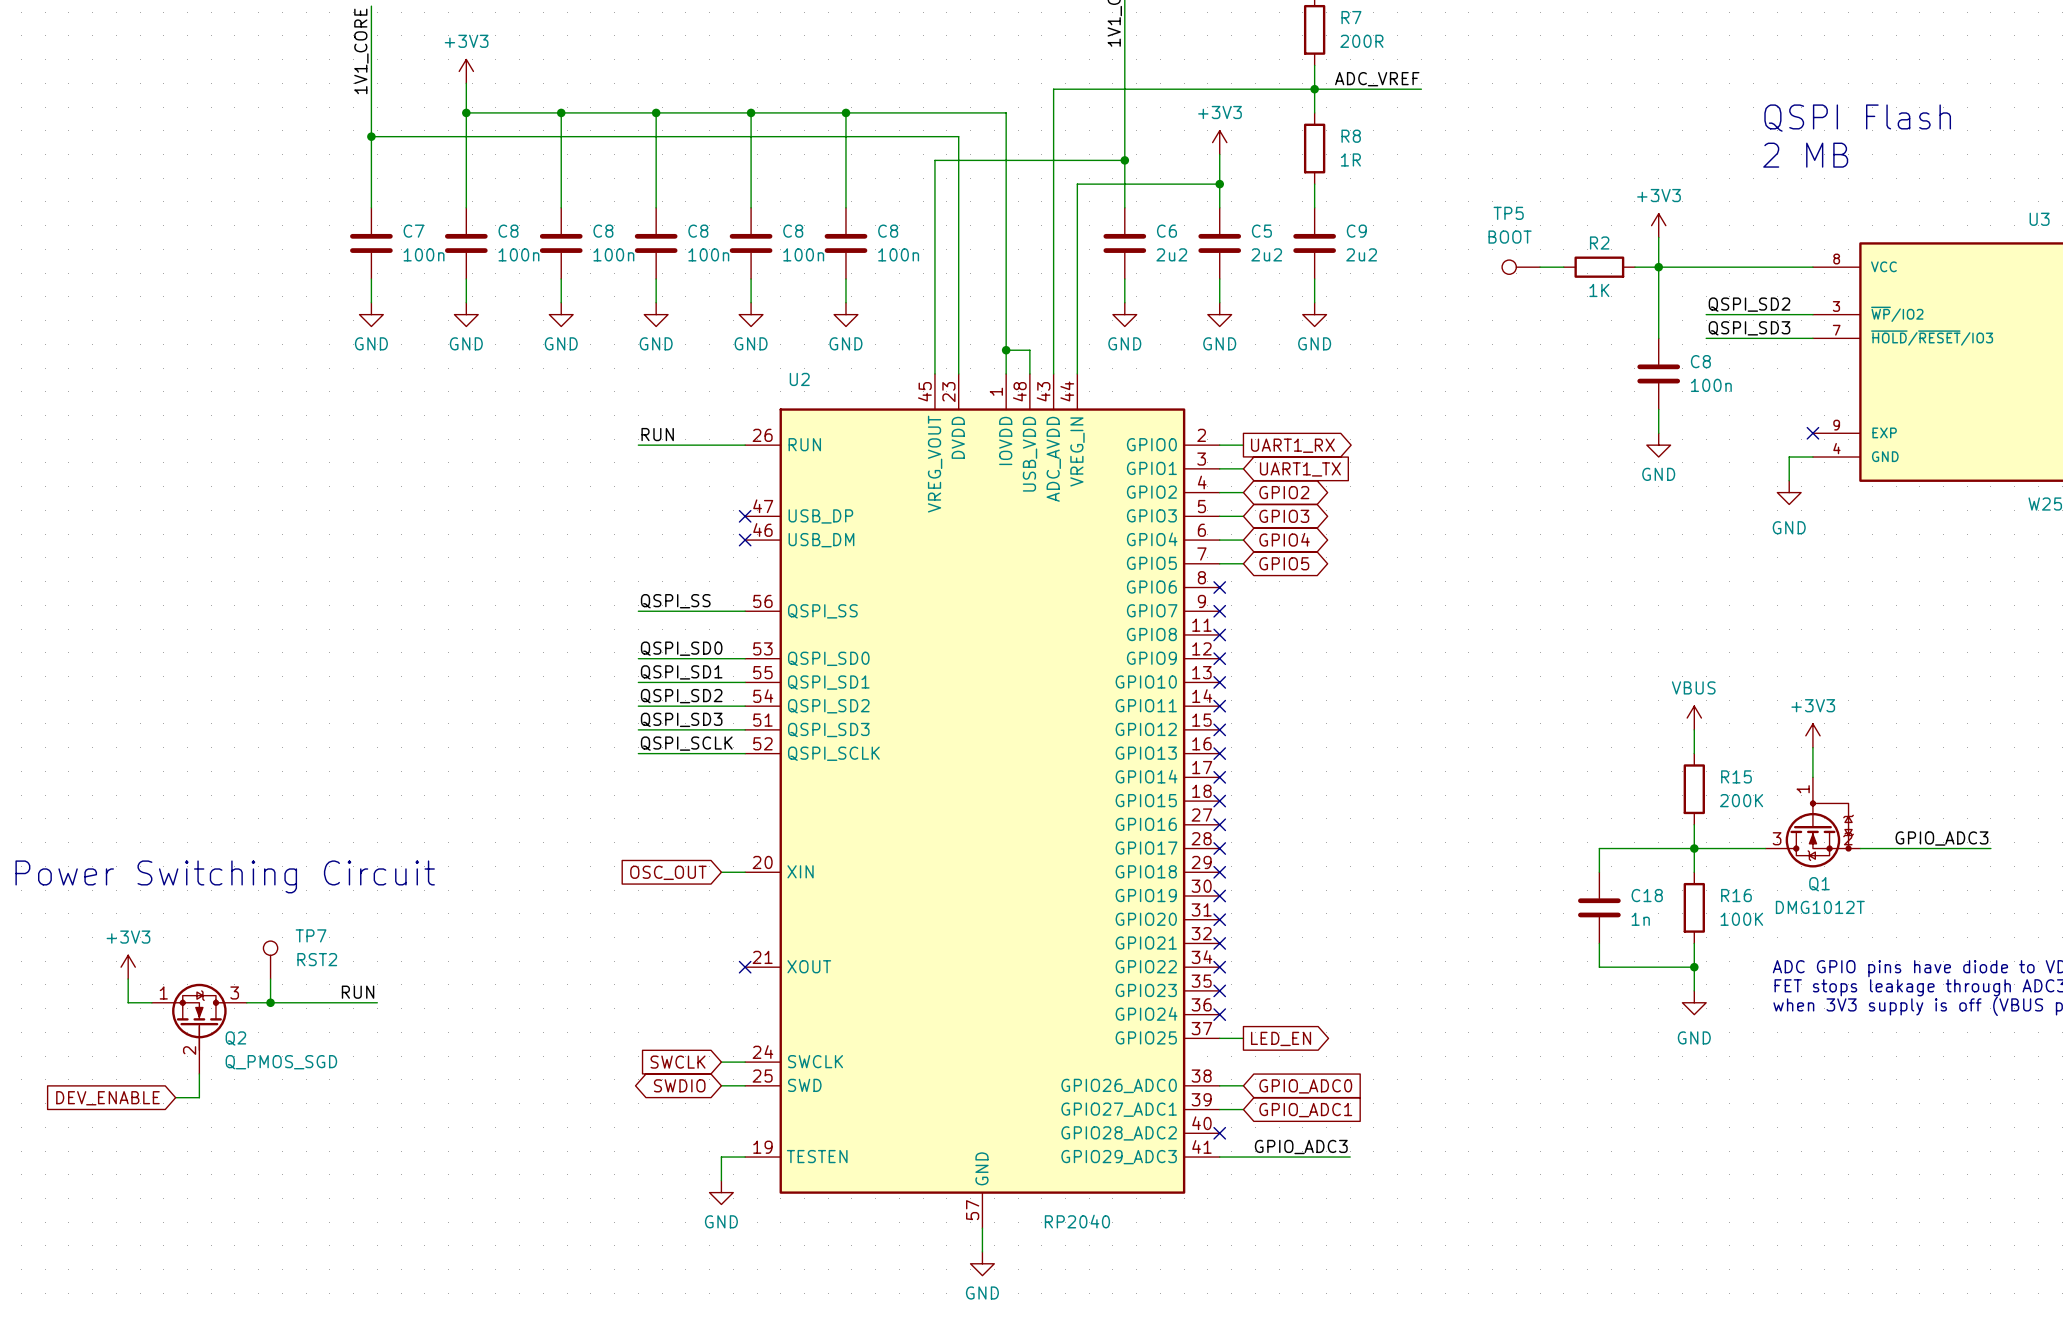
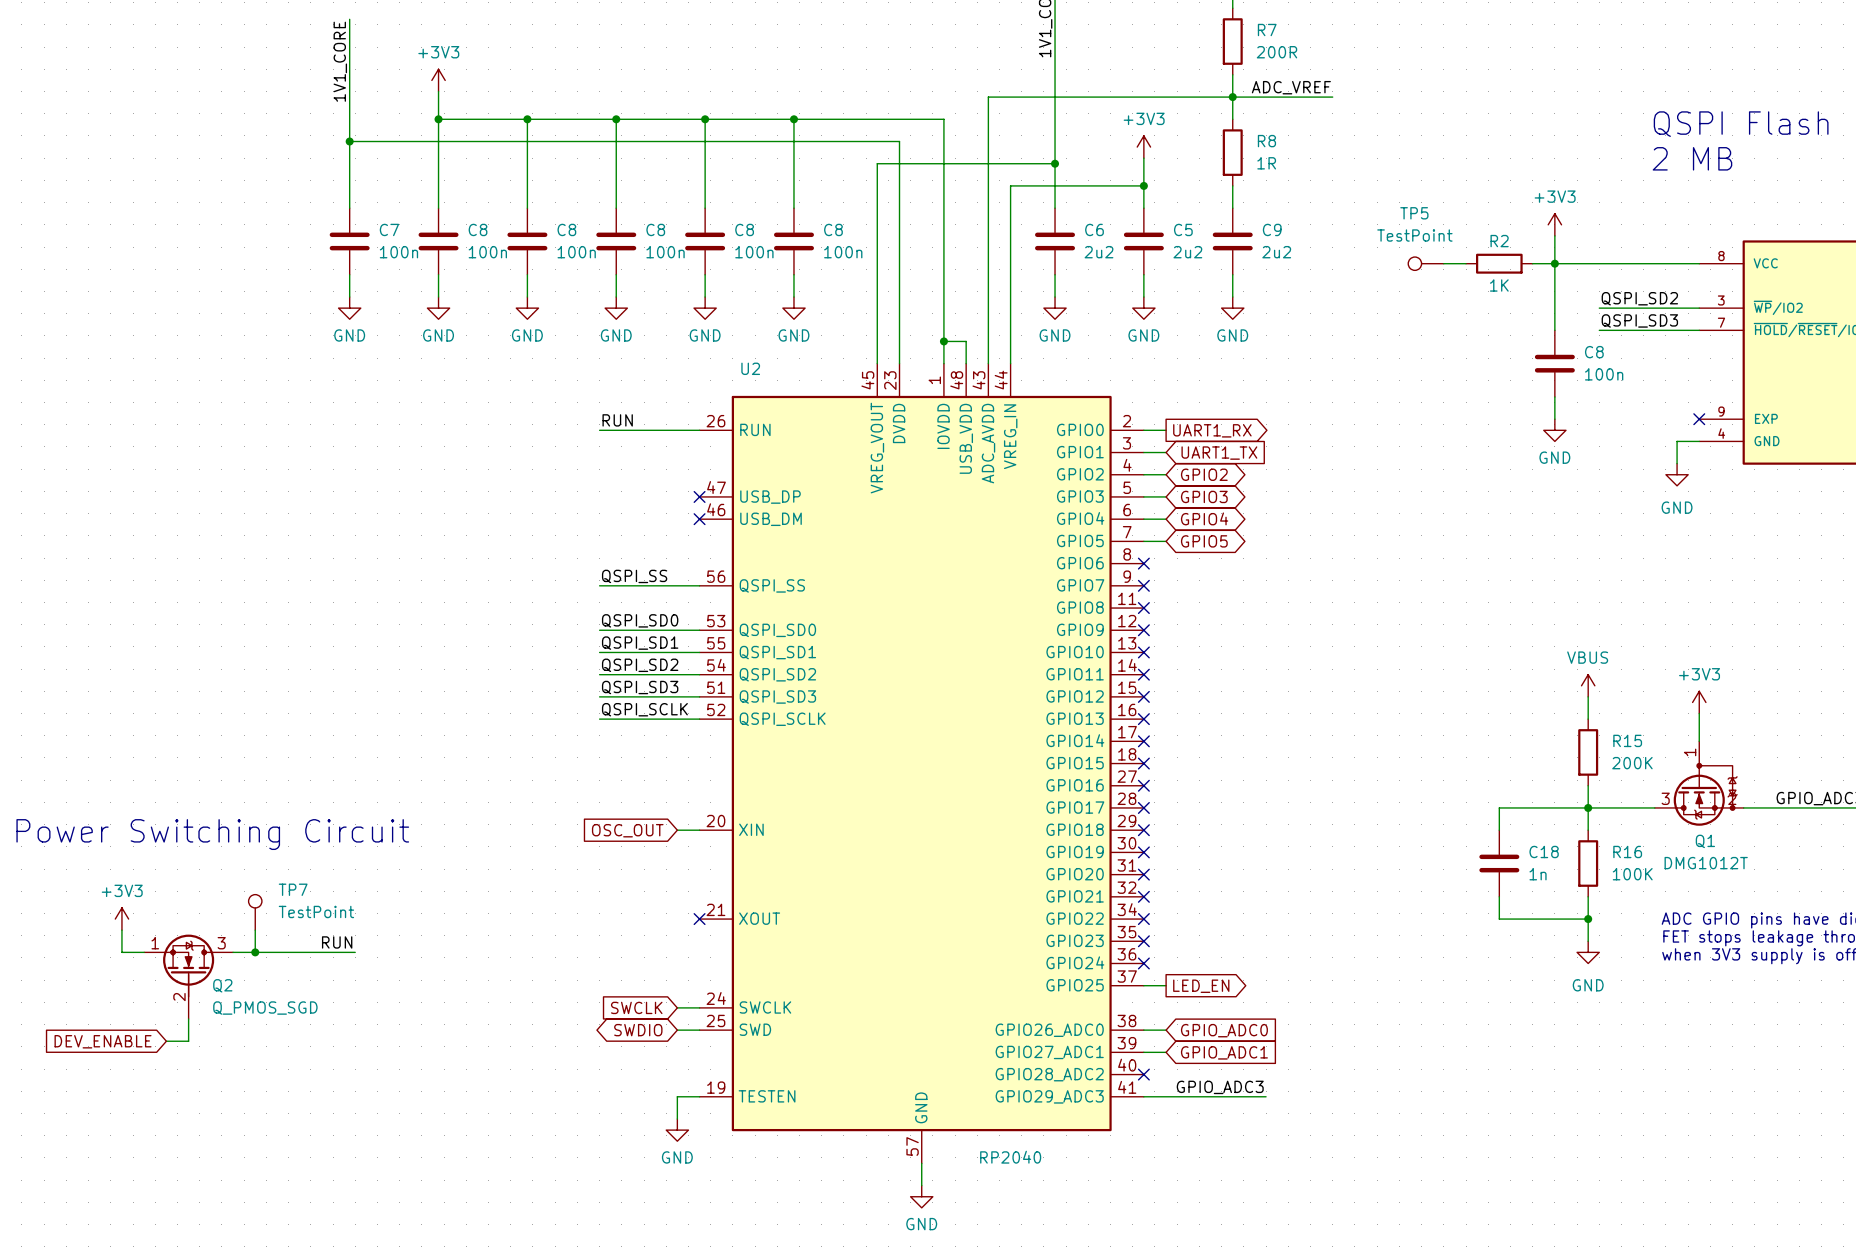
TP5 value: BOOT (1510, 237) -> TestPoint (1414, 235)
TP7 value: RST2 (317, 959) -> TestPoint (316, 911)

